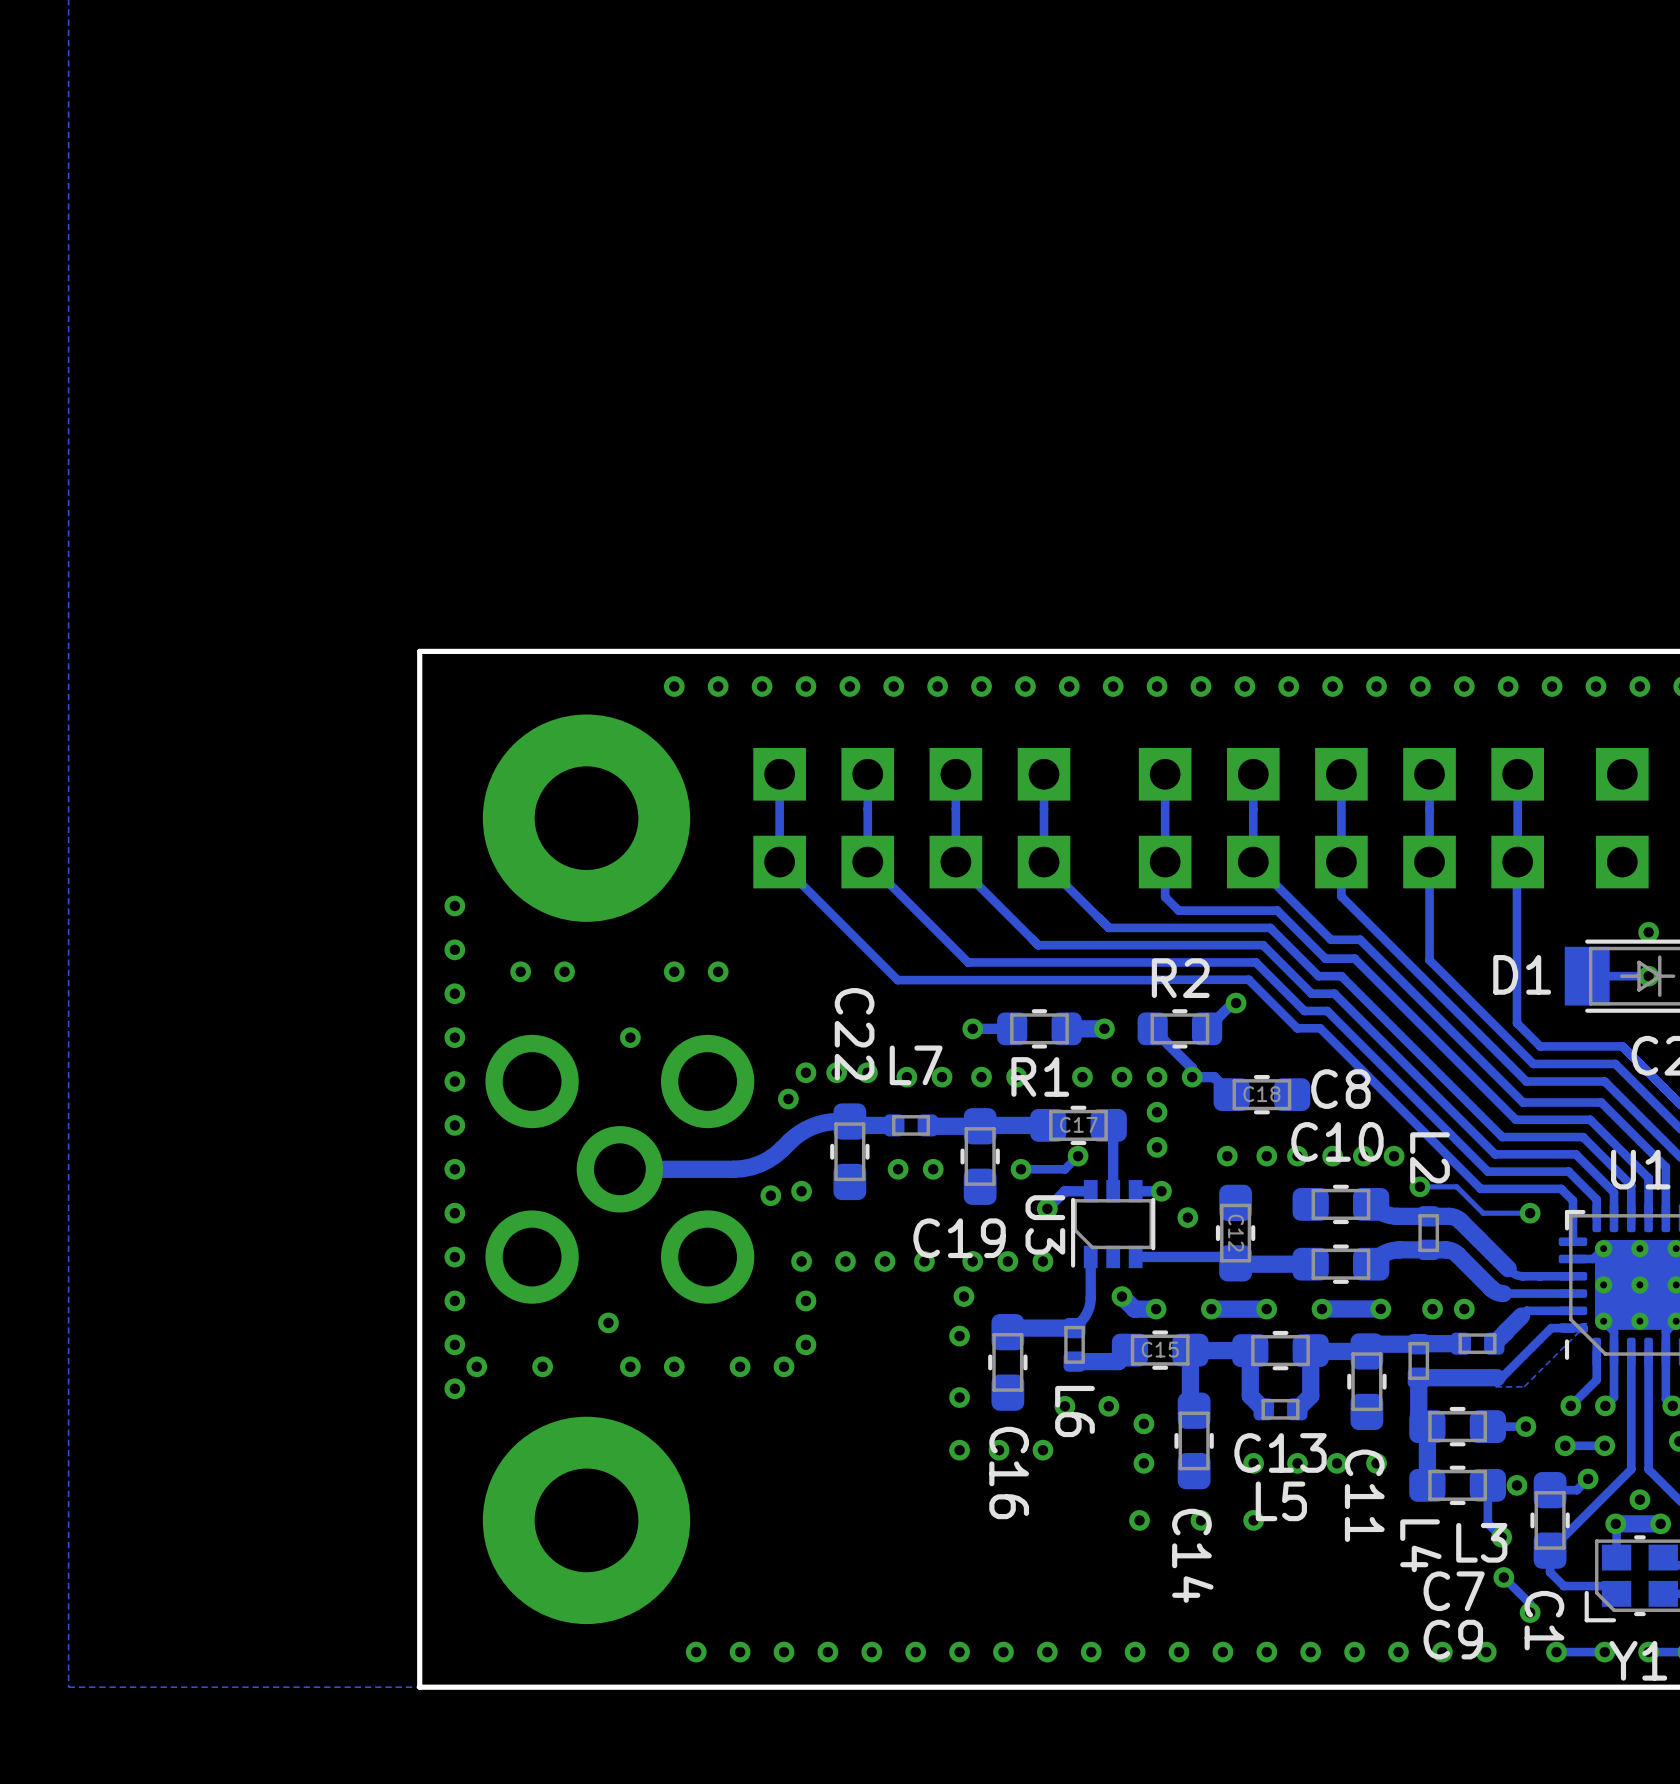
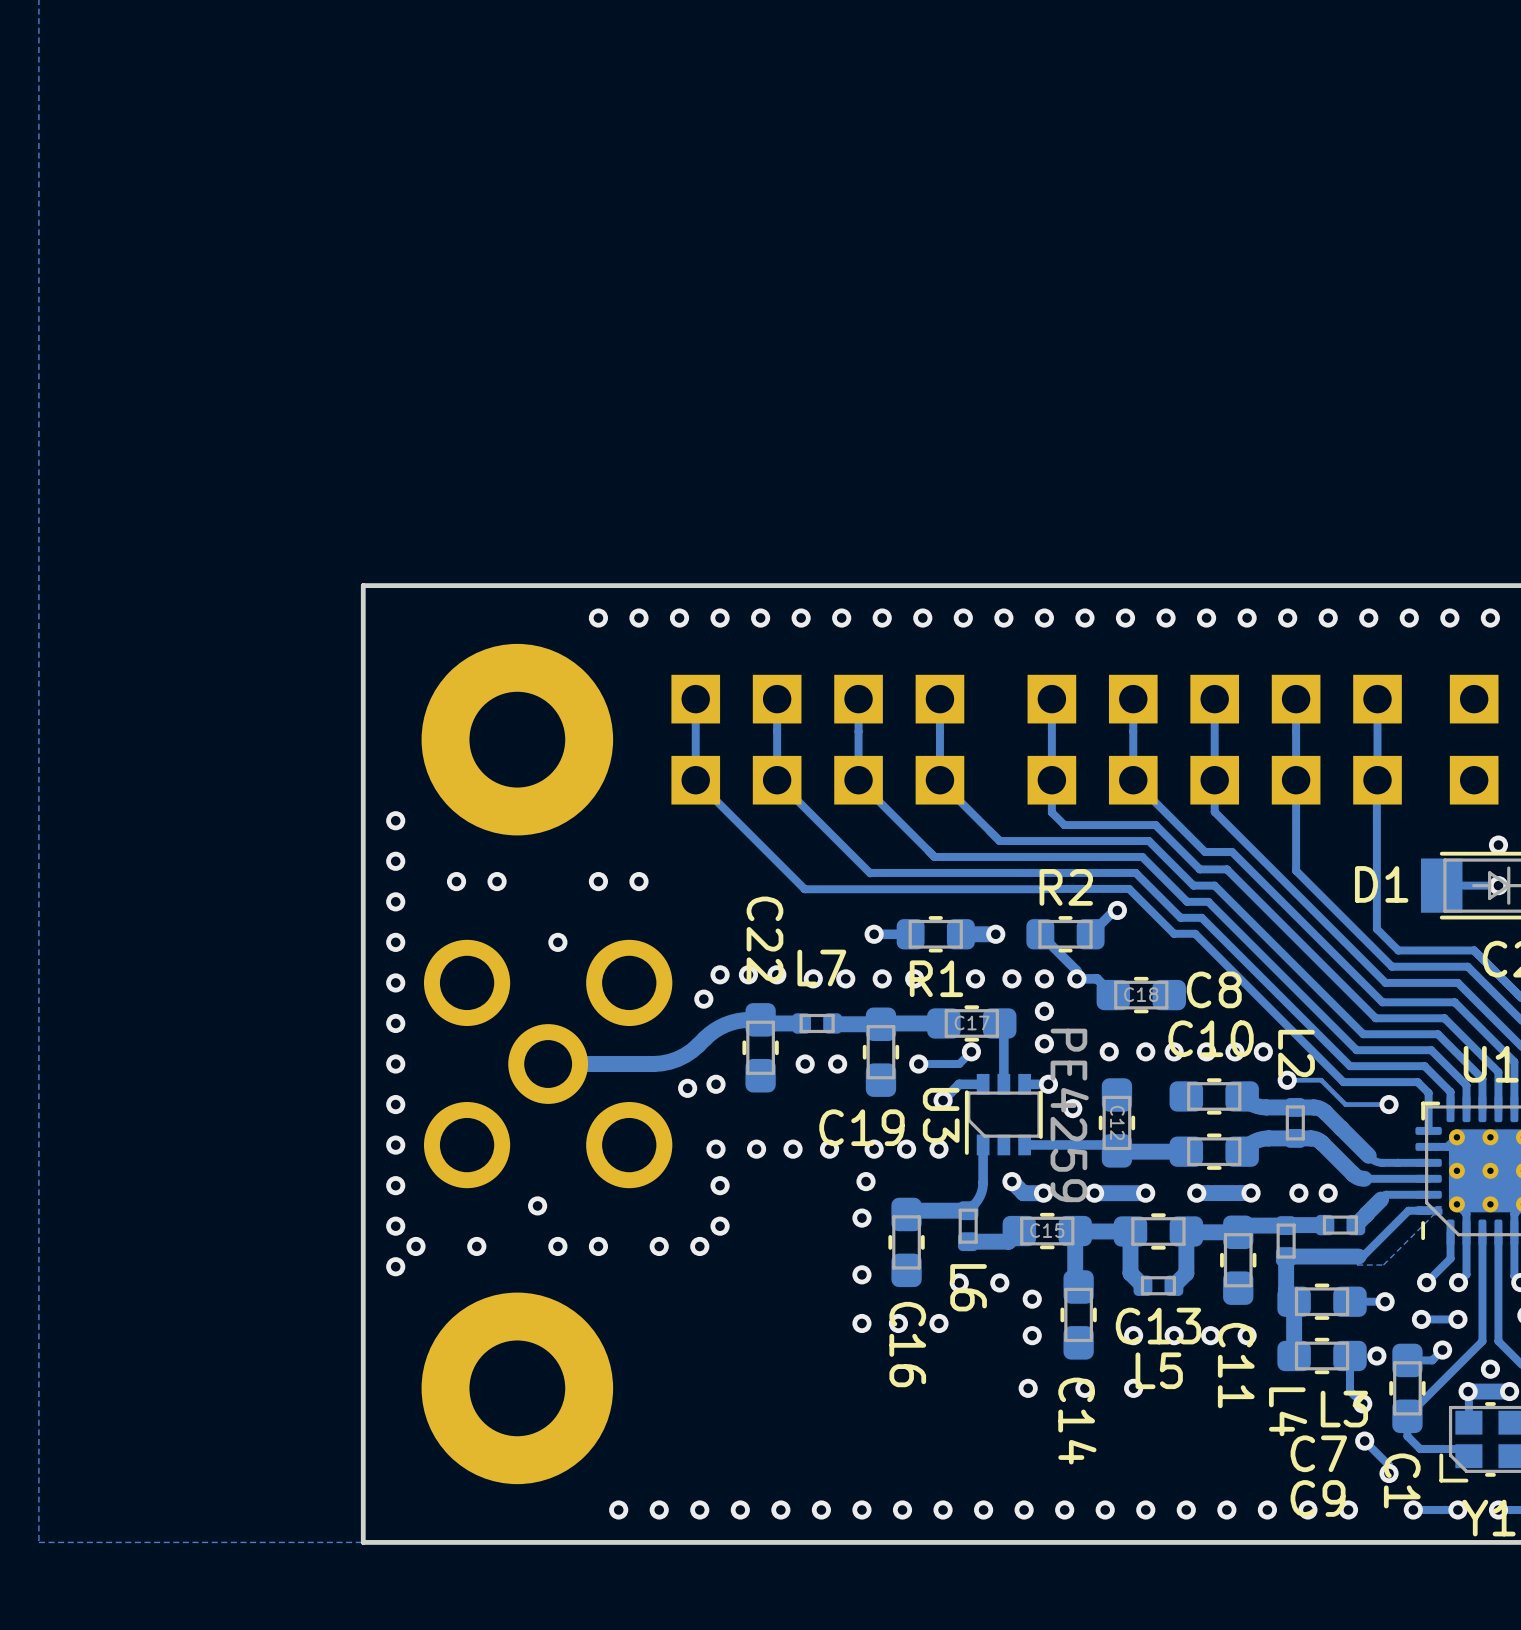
U3 value: none -> PE4259 (1069, 1115)

